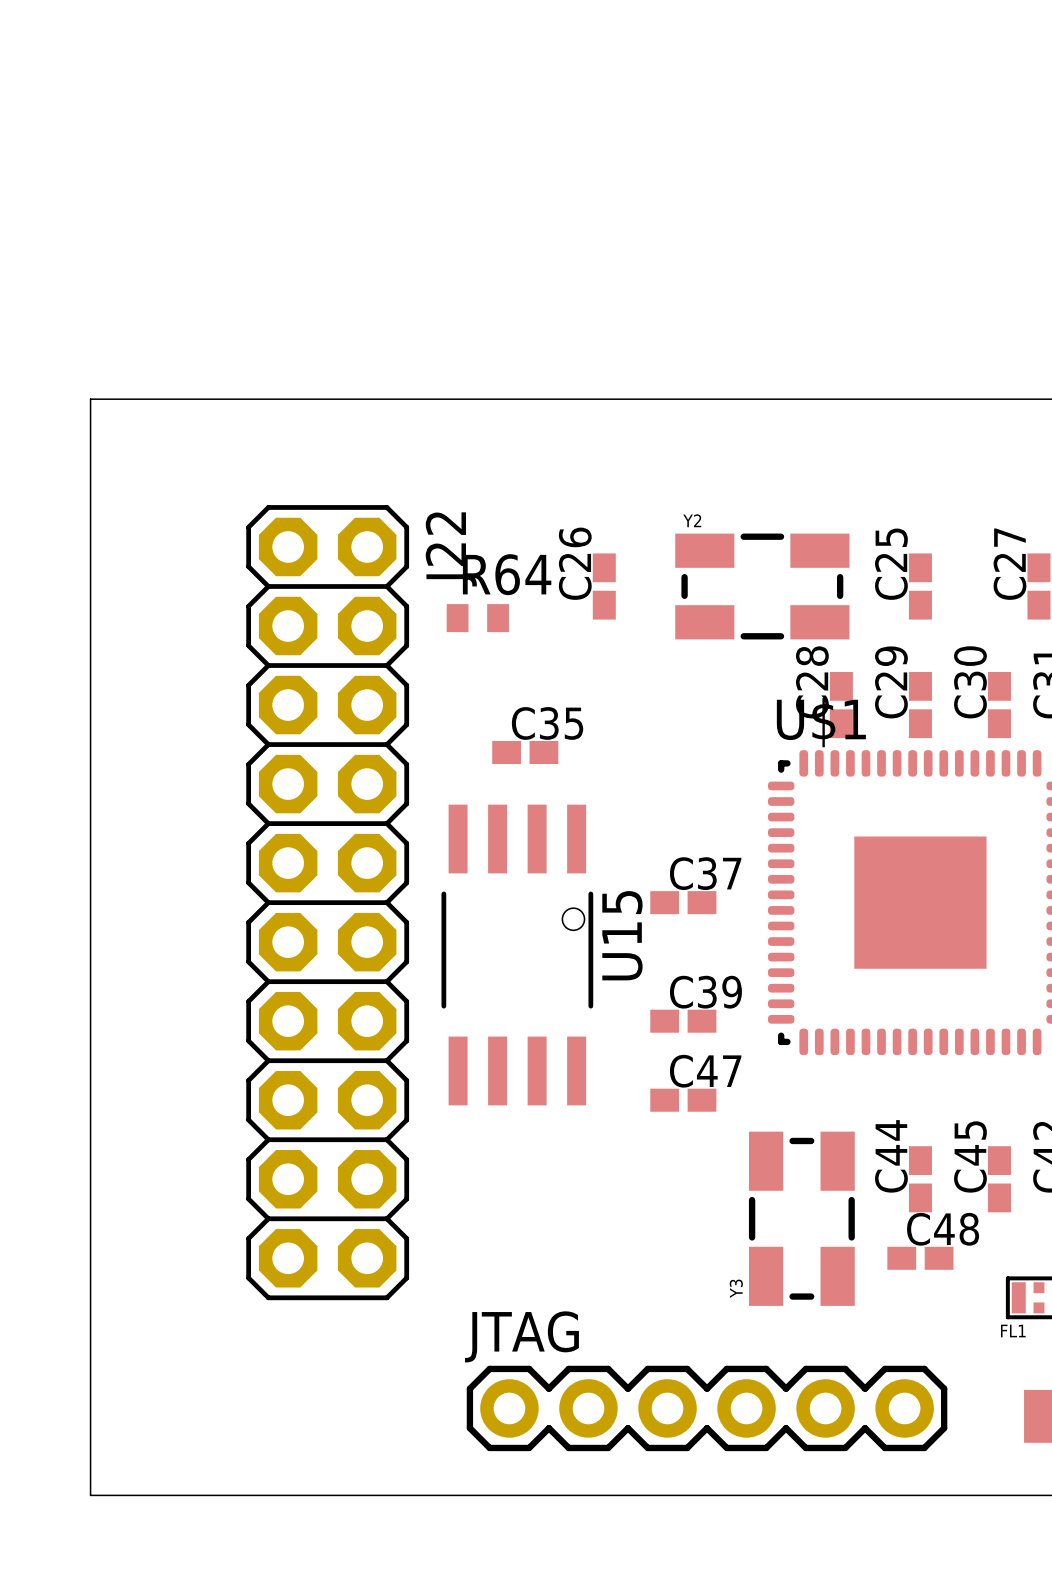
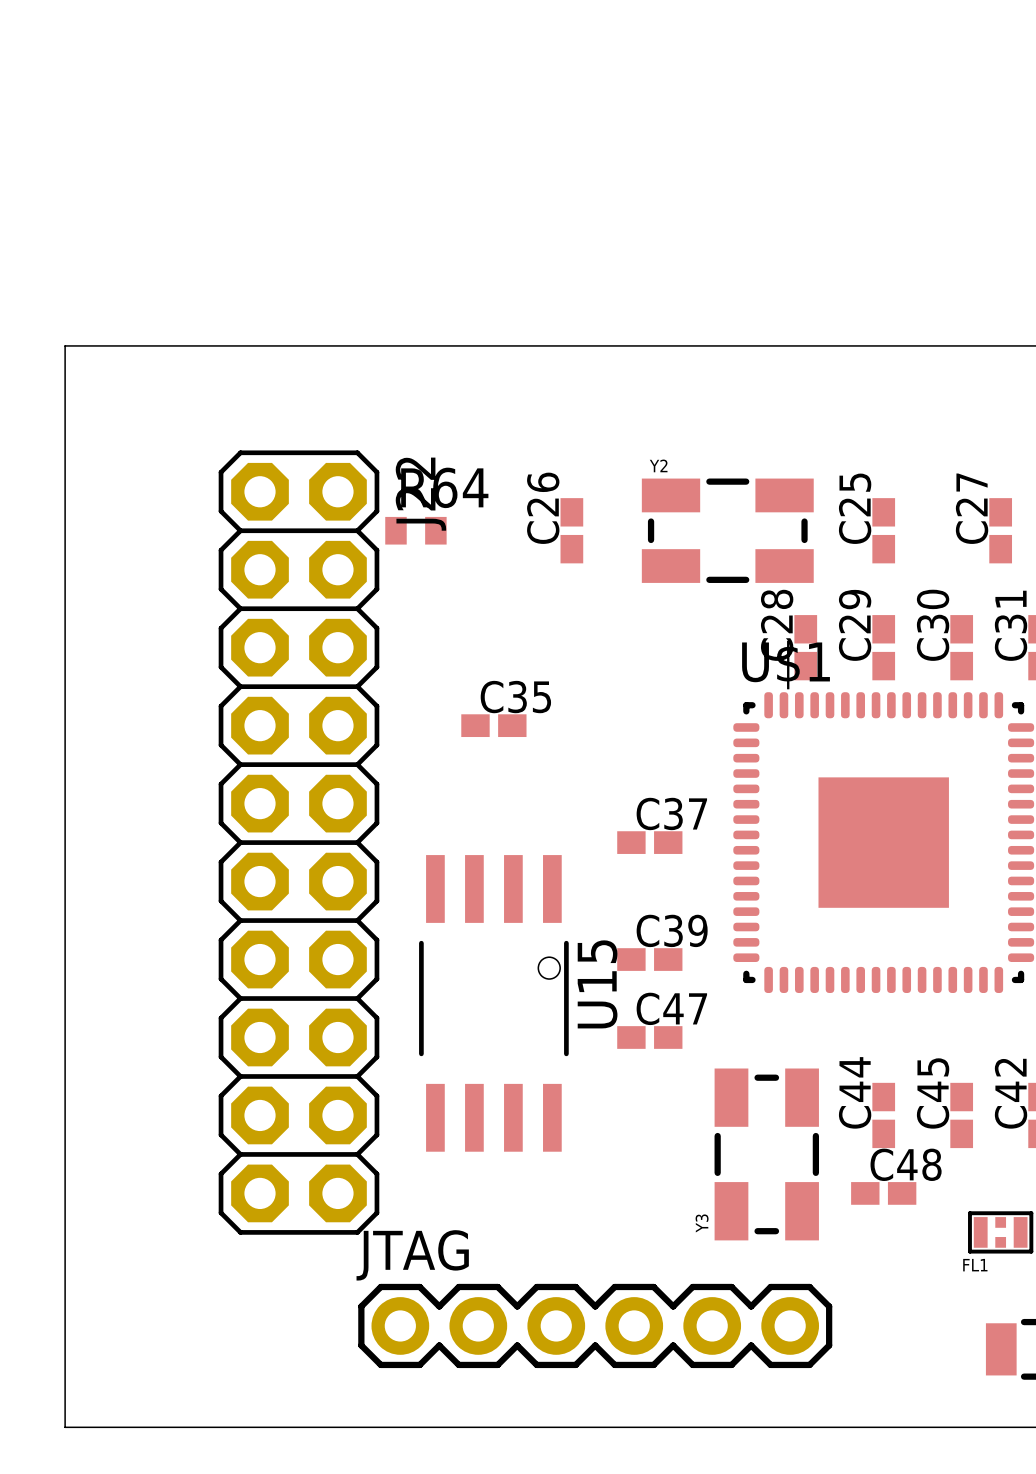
R64 position: (477, 618) -> (415, 530)
C35 position: (525, 752) -> (493, 725)
U15 position: (517, 954) -> (493, 1003)
JTAG position: (707, 1408) -> (595, 1325)

